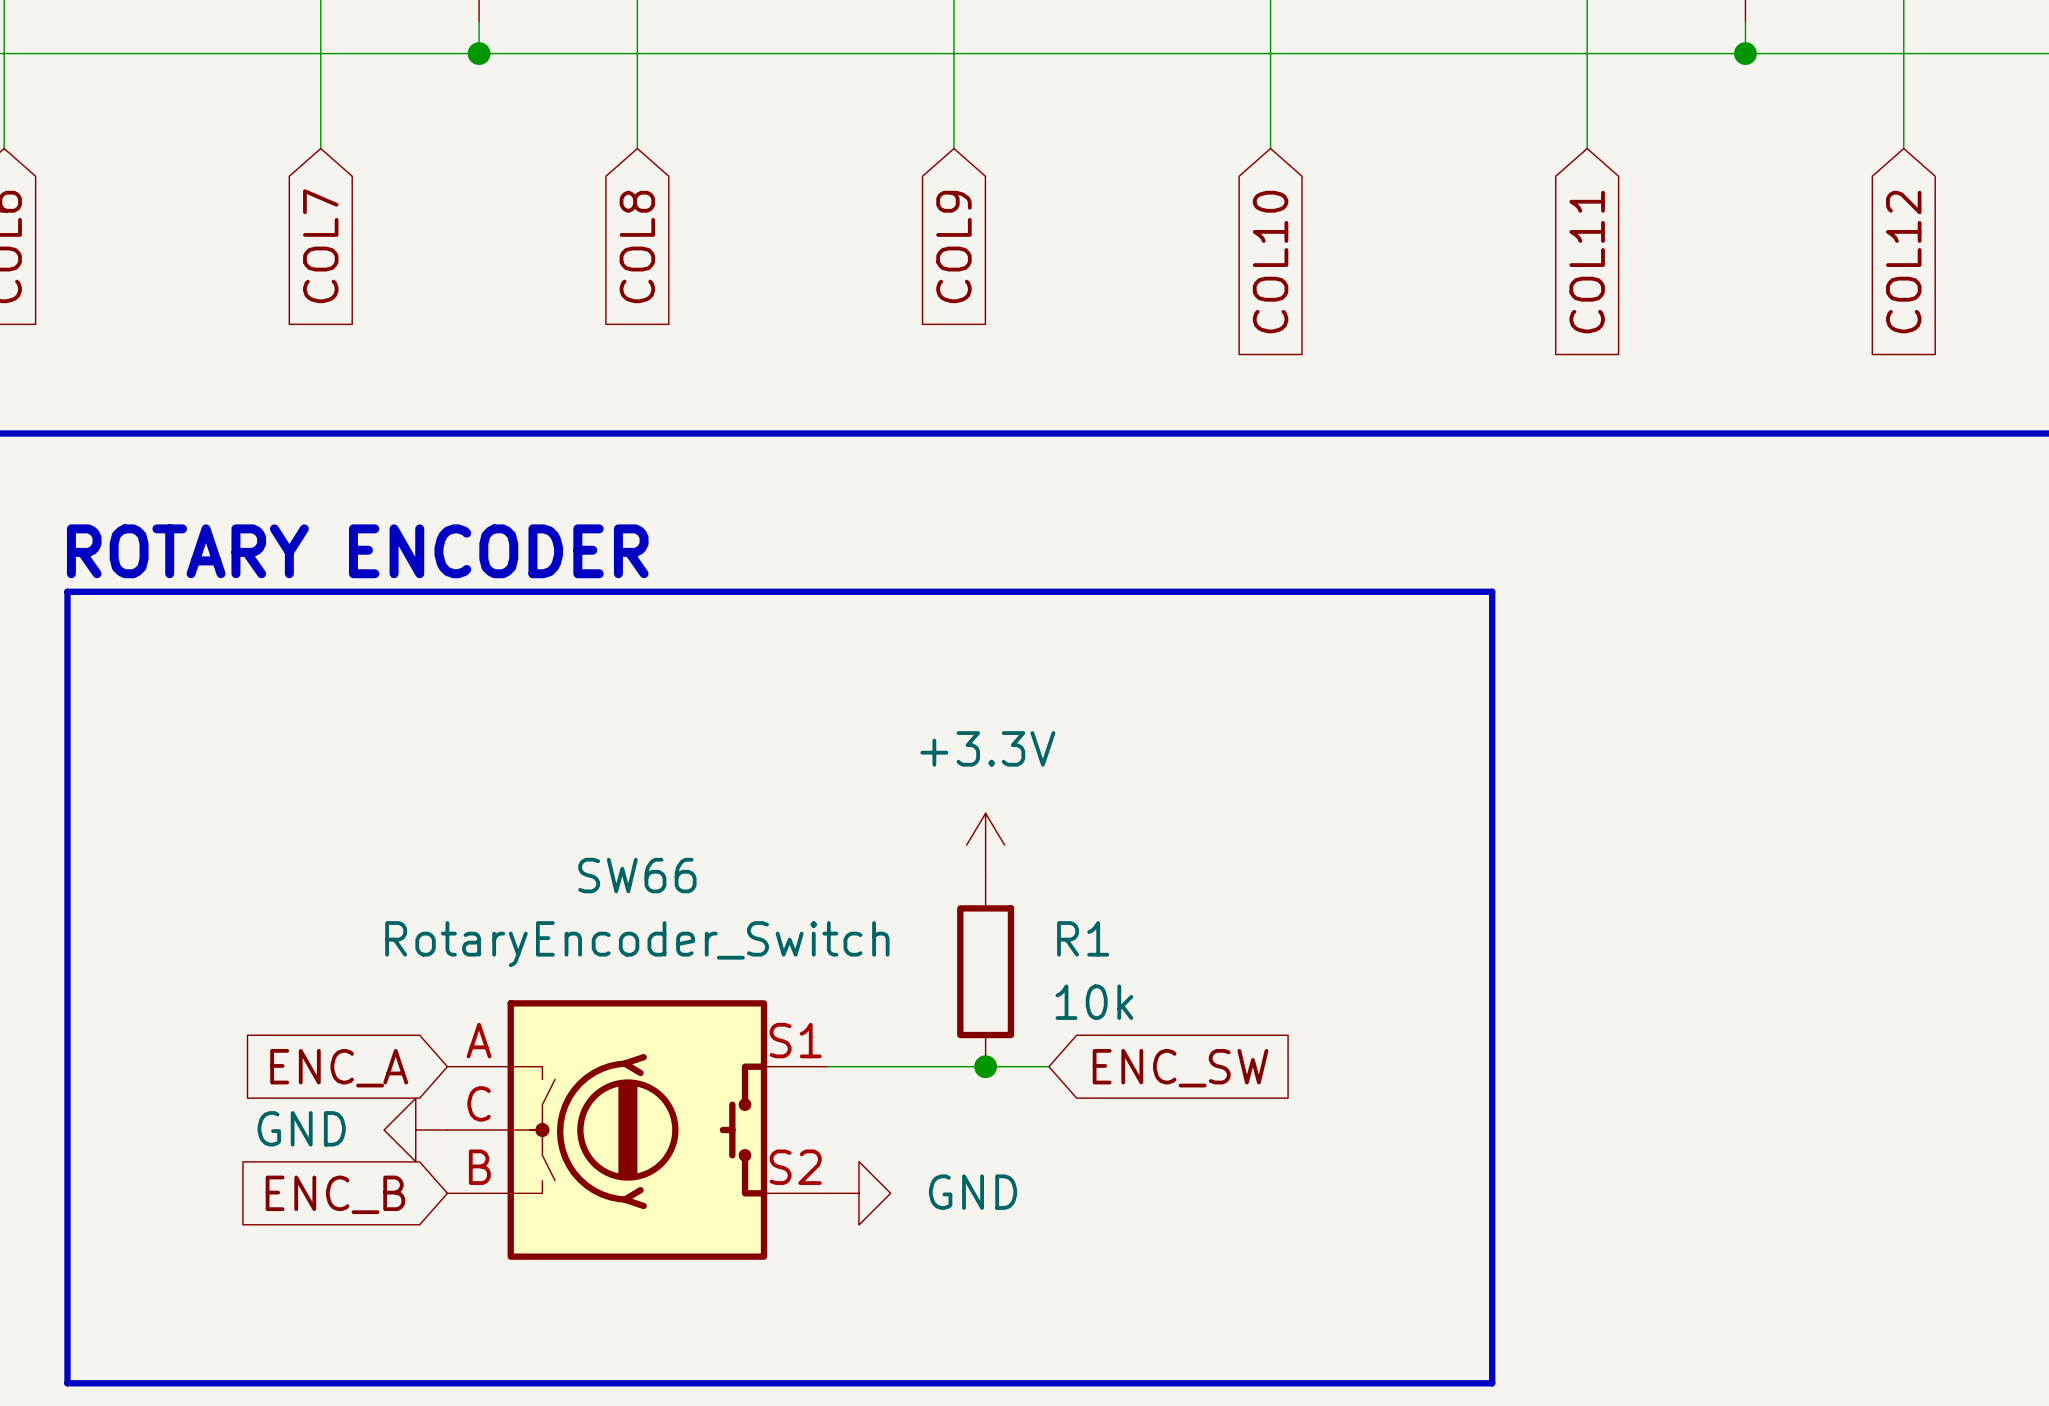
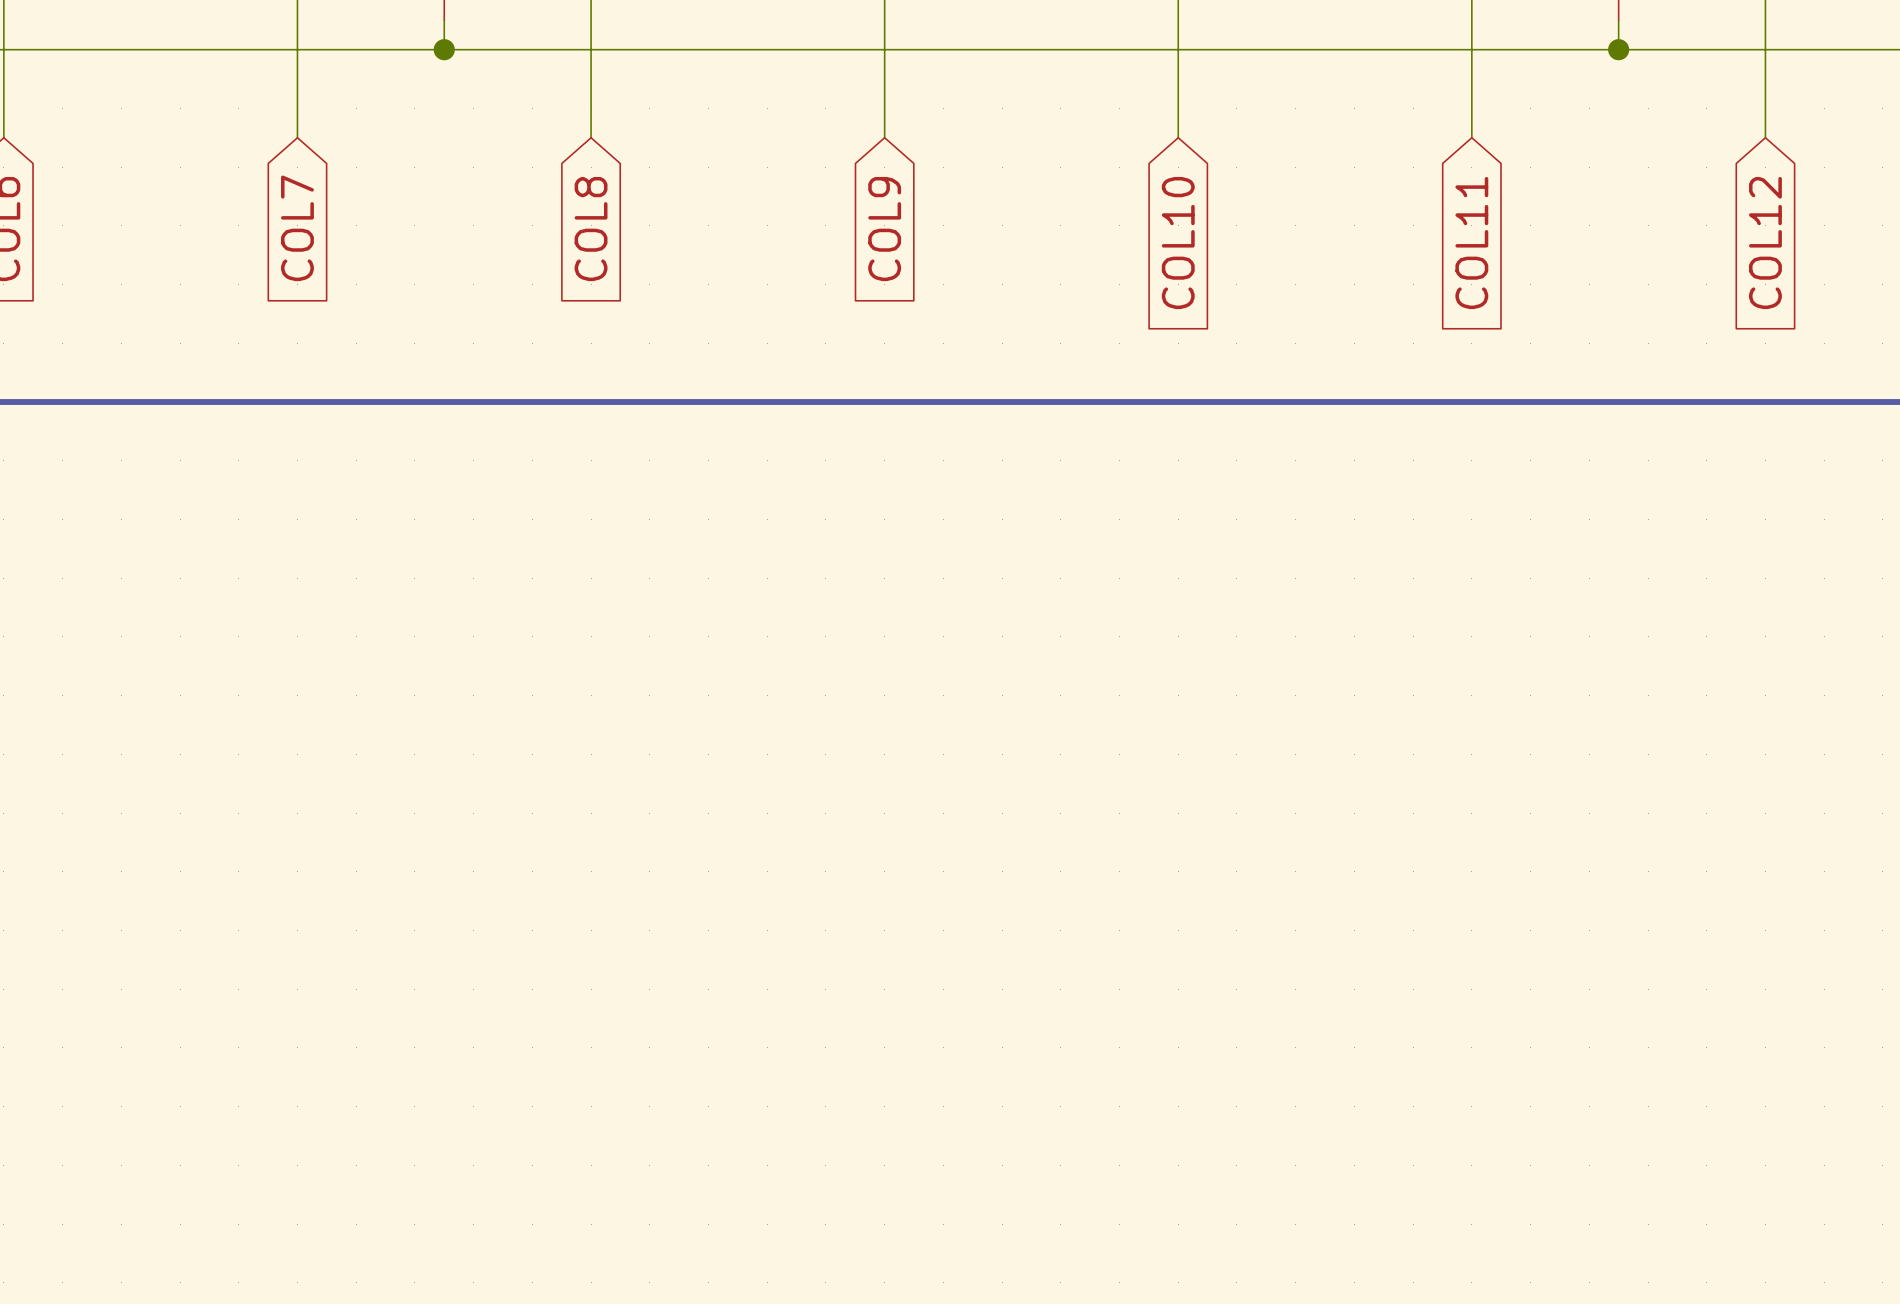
text: ROTARY ENCODER (357, 551) -> none
line: (67, 591) (1492, 591) (1492, 1383) (67, 1383) (67, 591) -> none
power symbol: +3.3V (985, 845) -> none
R1: 10k (985, 971) -> none
wire: (827, 1066) (1048, 1066) -> none
junction: (985, 1066) -> none
global label: ENC_A (339, 1068) -> none
global label: ENC_SW (1180, 1068) -> none
power symbol: GND (415, 1130) -> none
SW66: RotaryEncoder_Switch (637, 1130) -> none
power symbol: GND (858, 1193) -> none
global label: ENC_B (335, 1194) -> none

